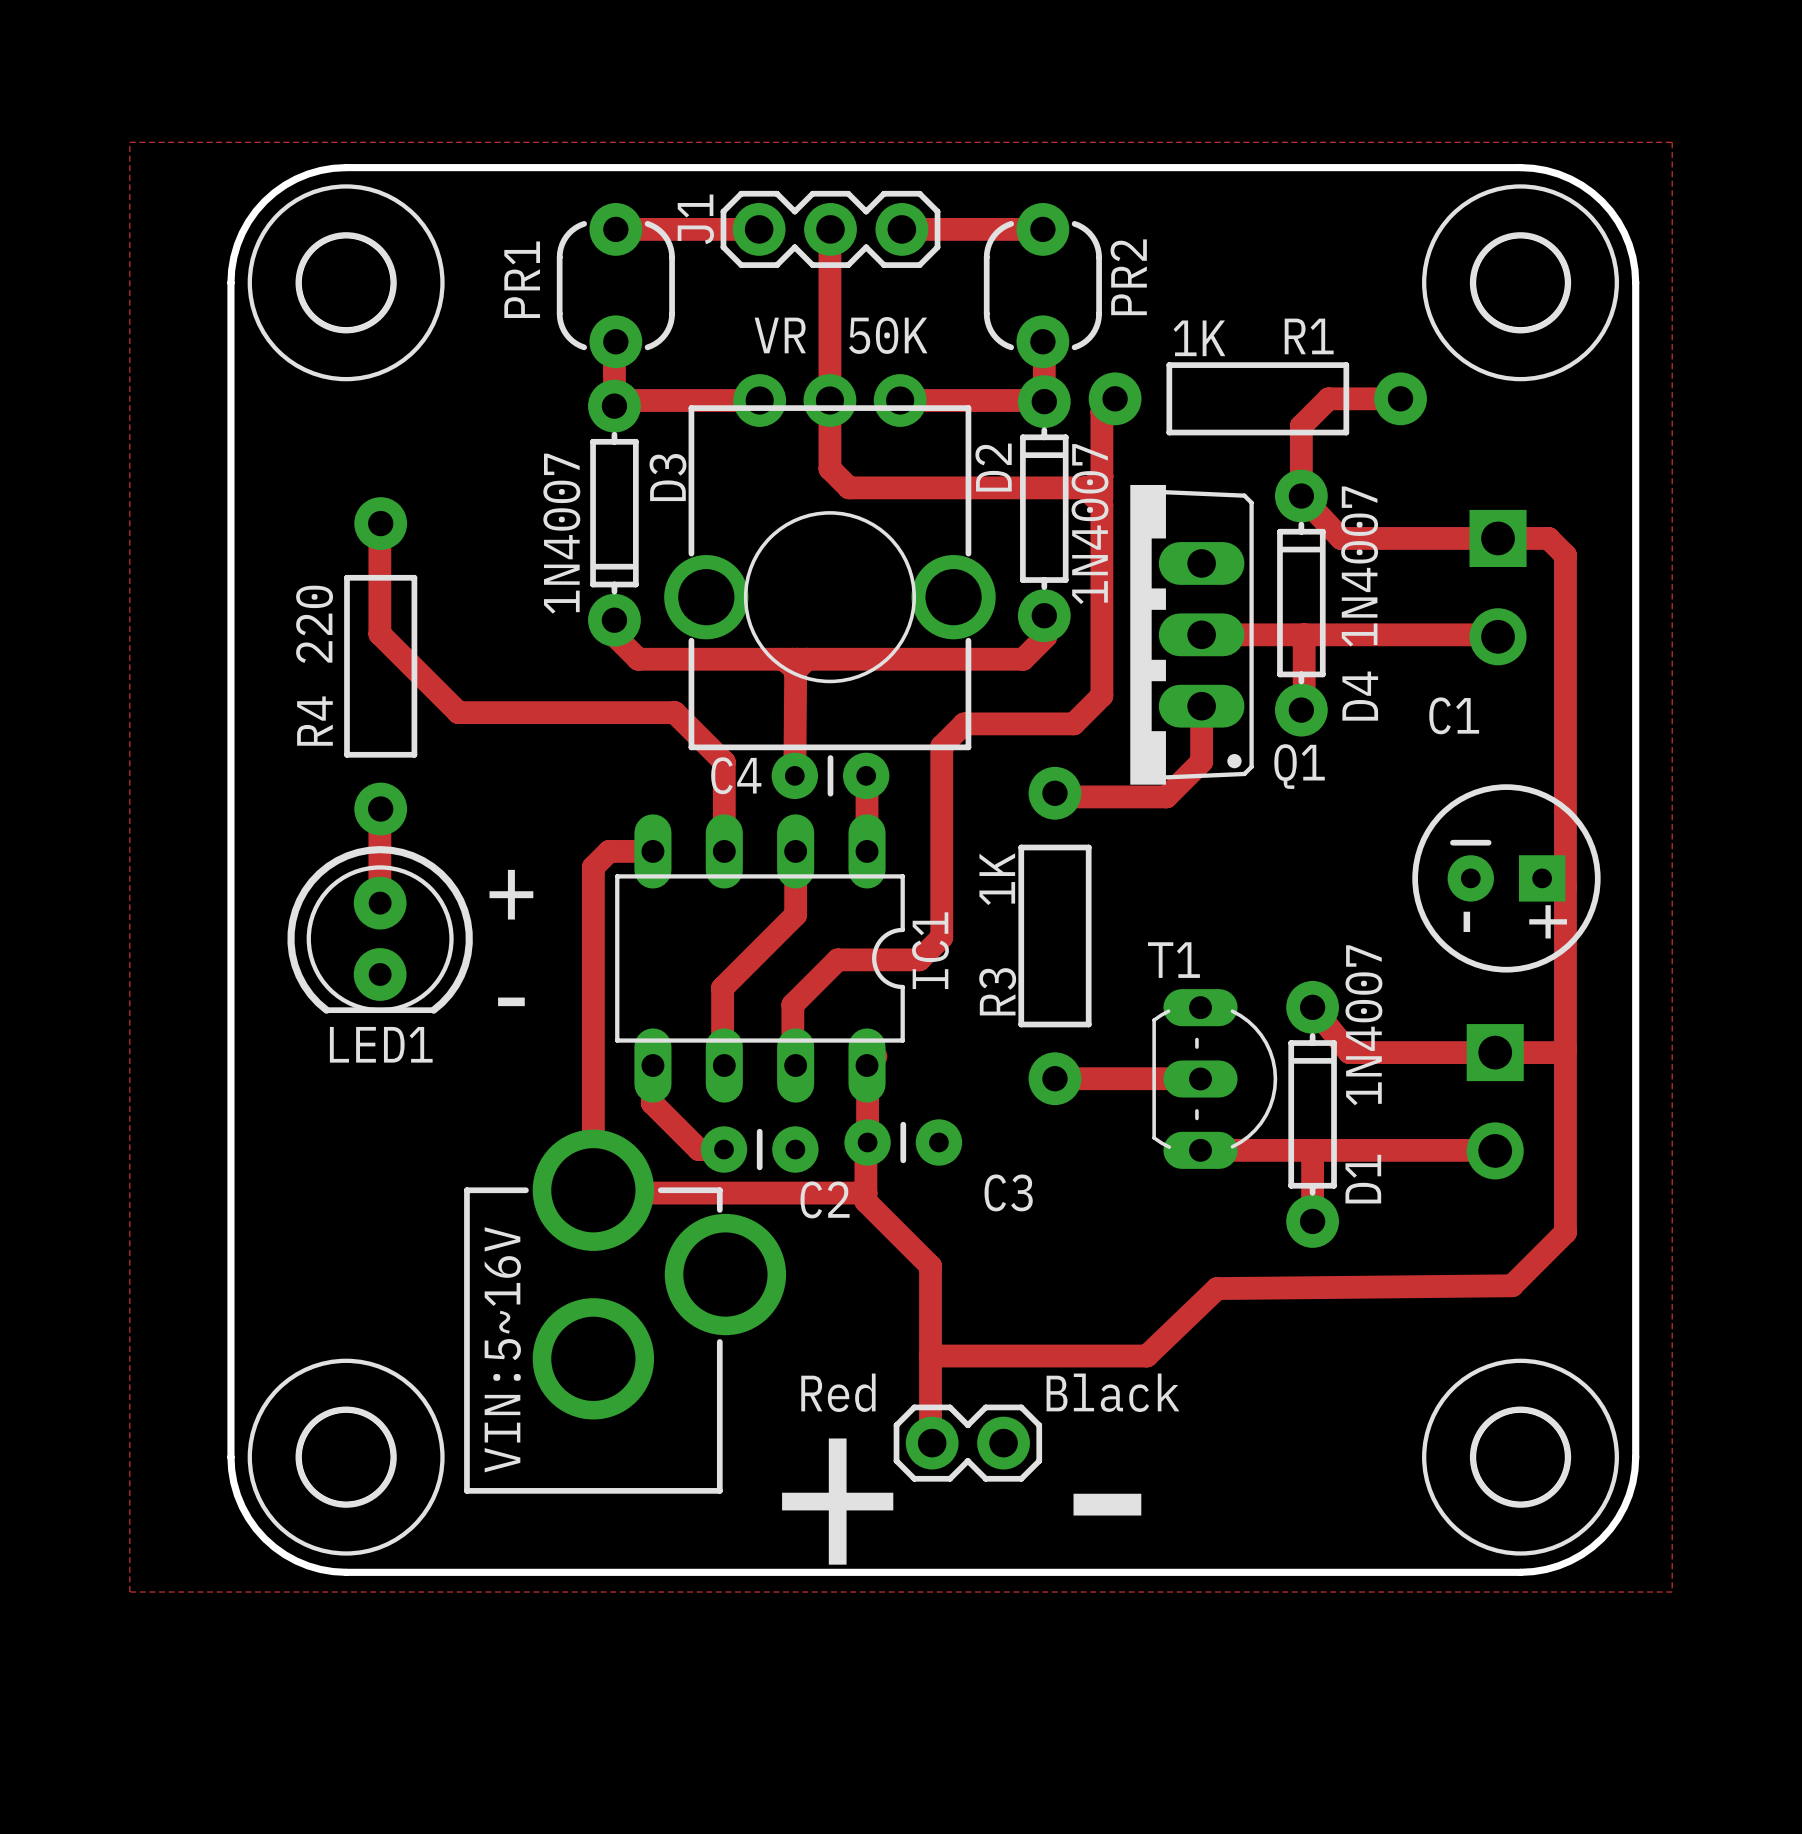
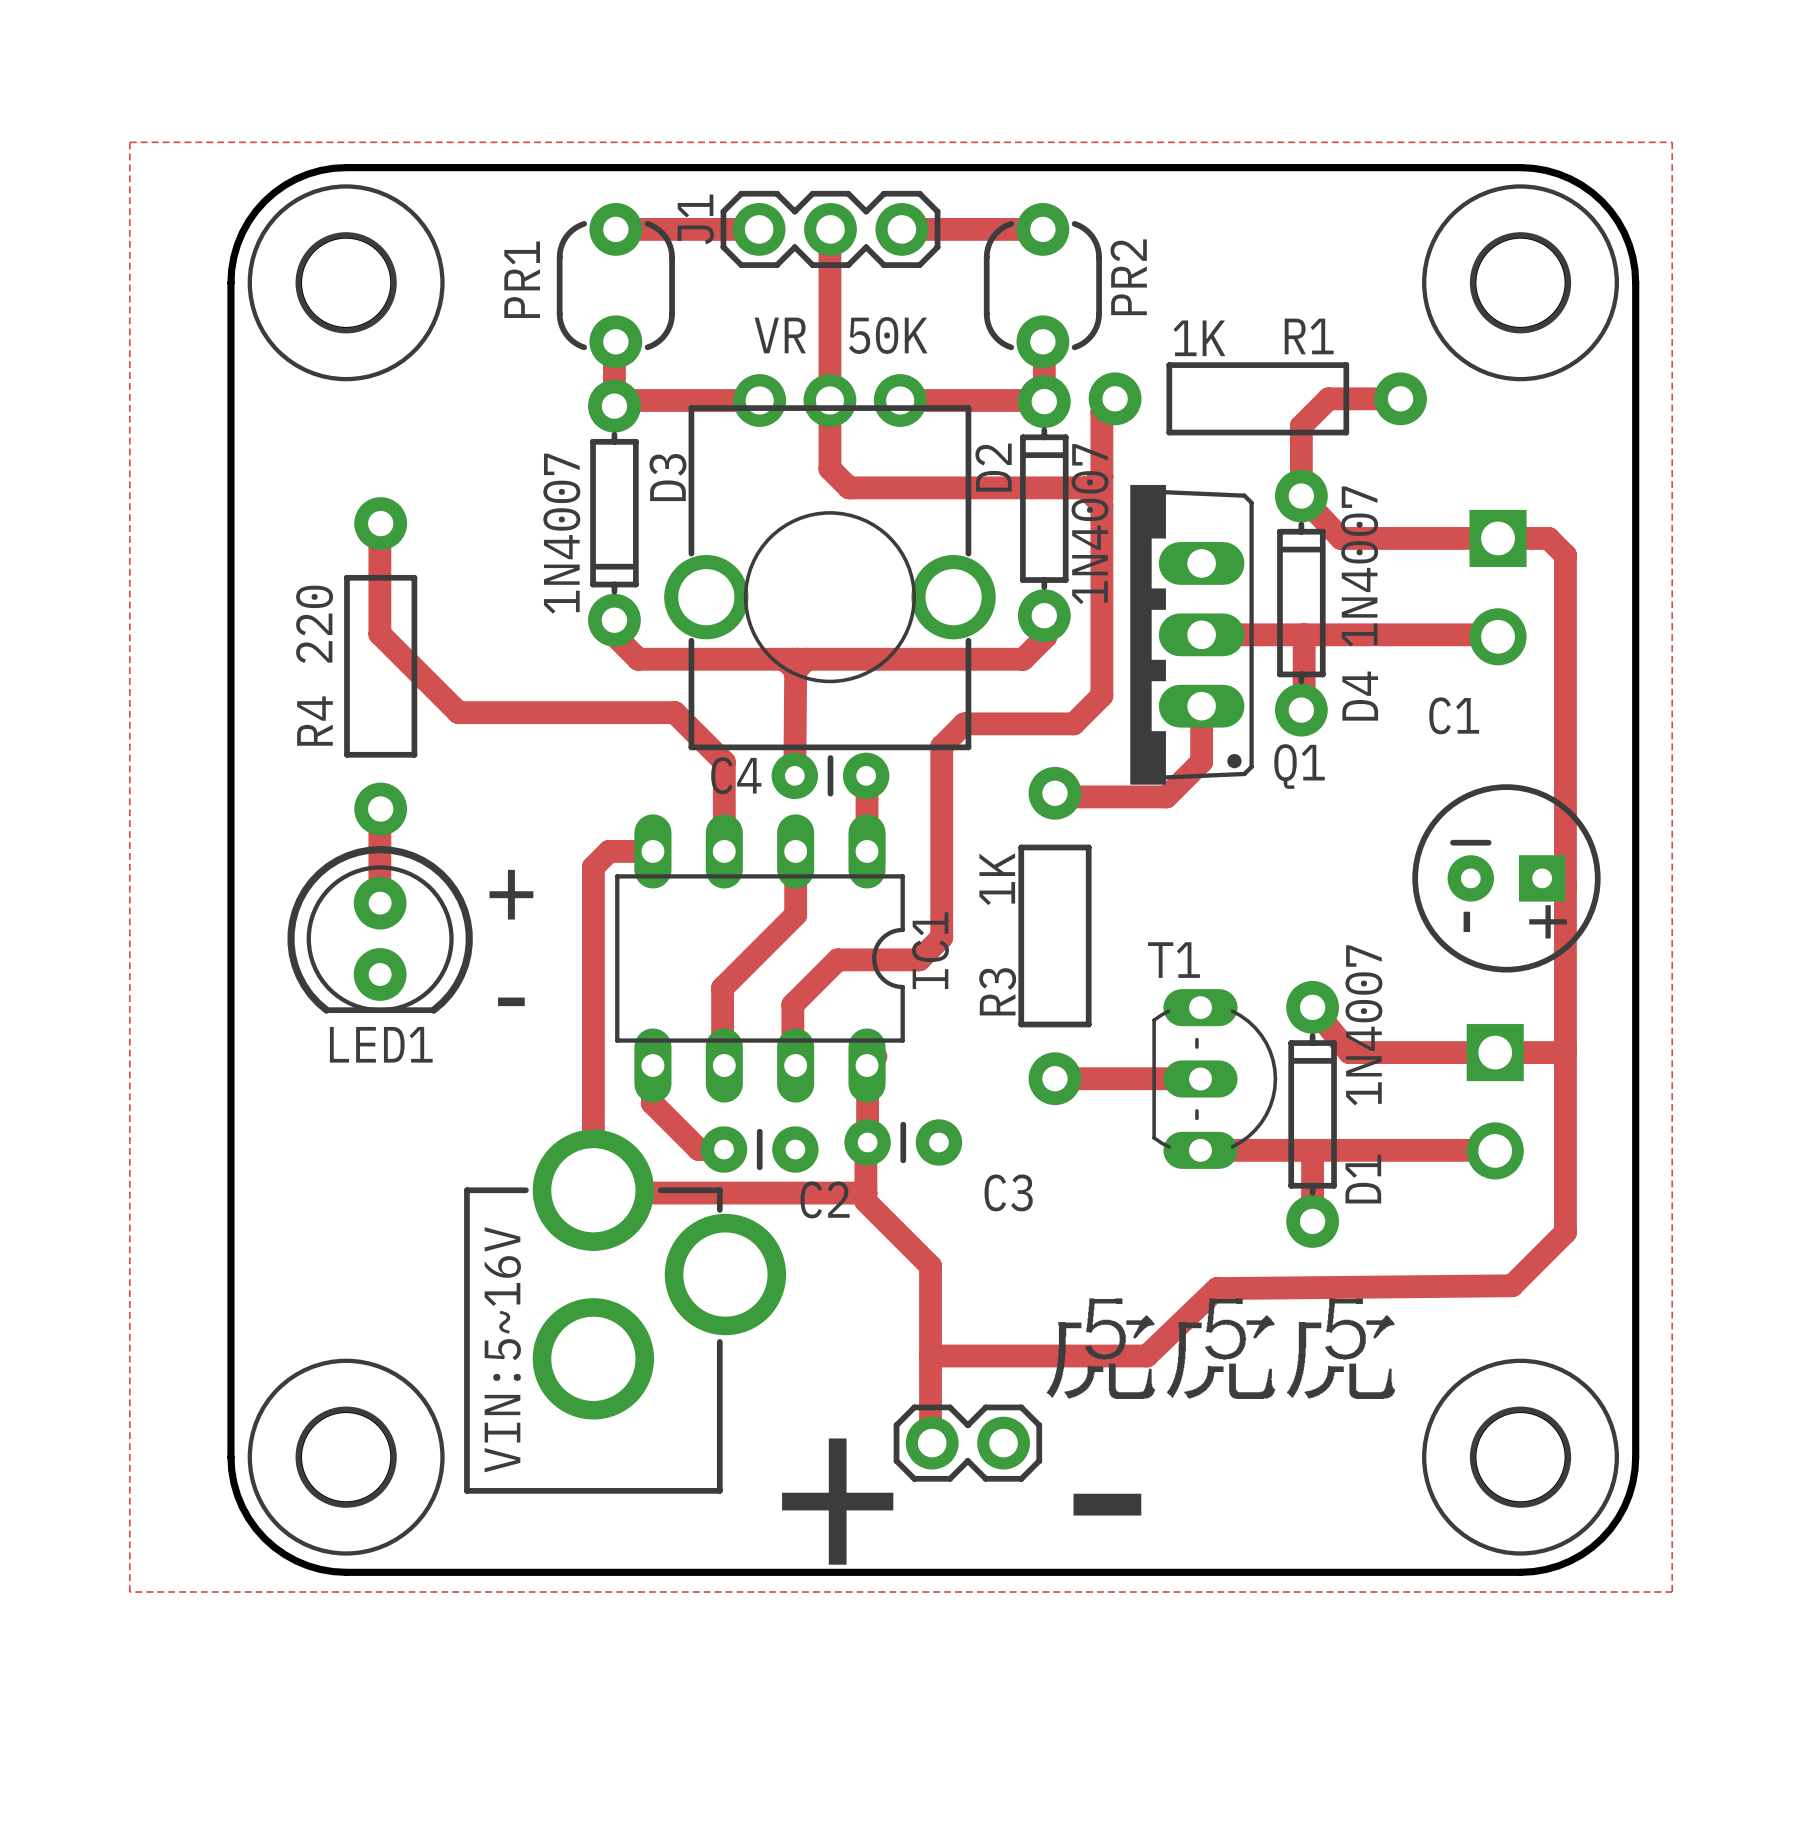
drawing: none -> [1046, 1298, 1395, 1400]
text: Red (838, 1392) -> none
text: Black (1112, 1392) -> none

